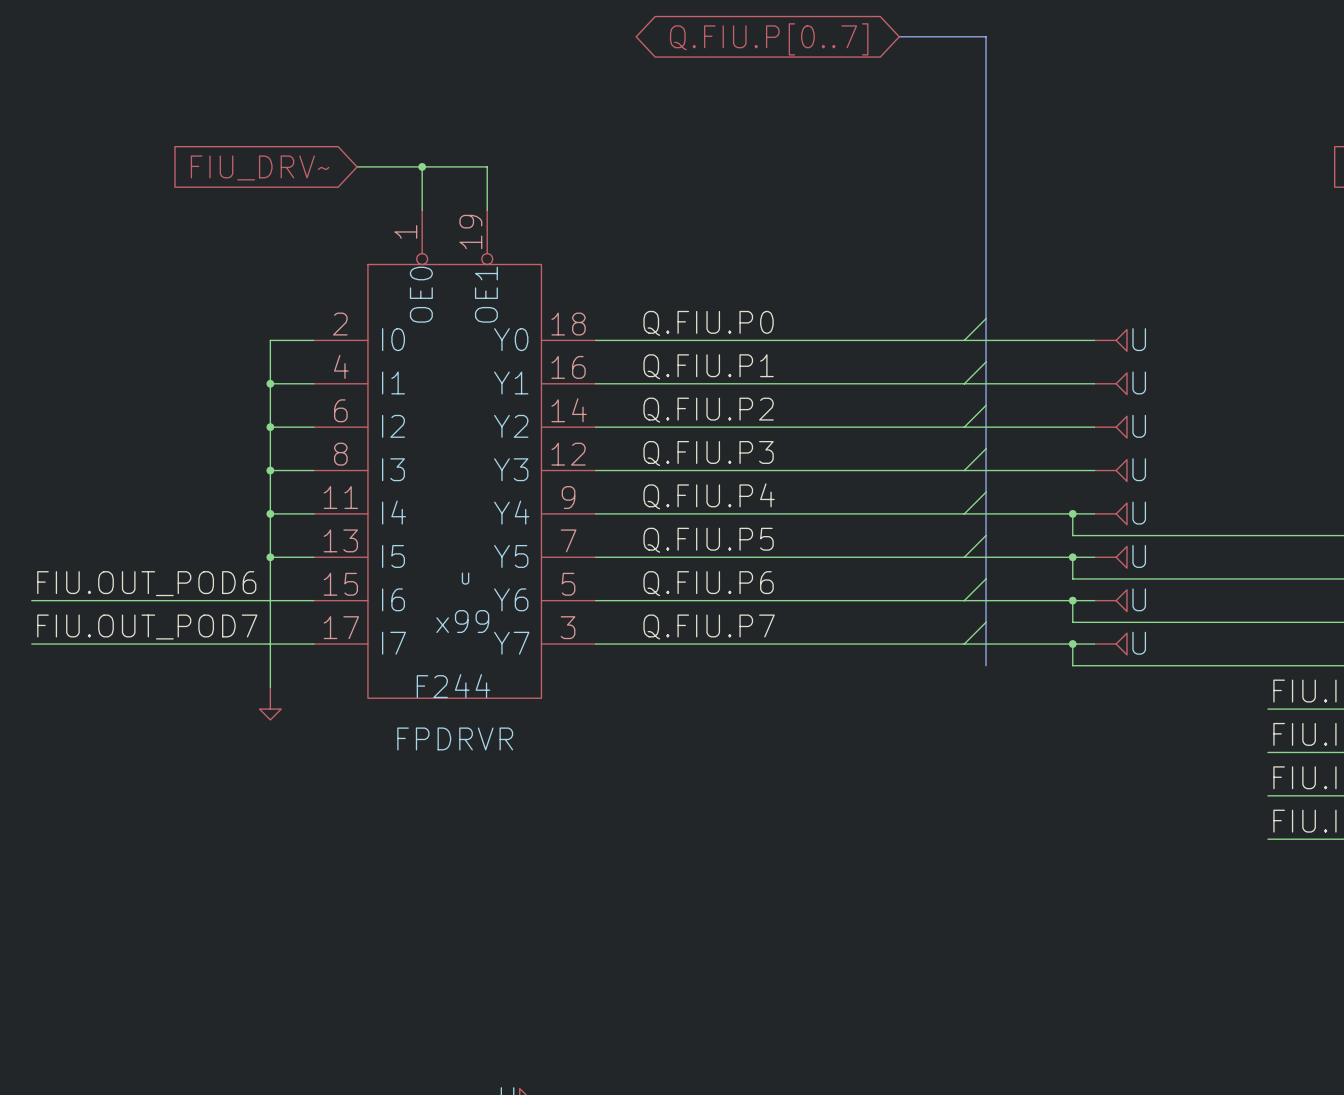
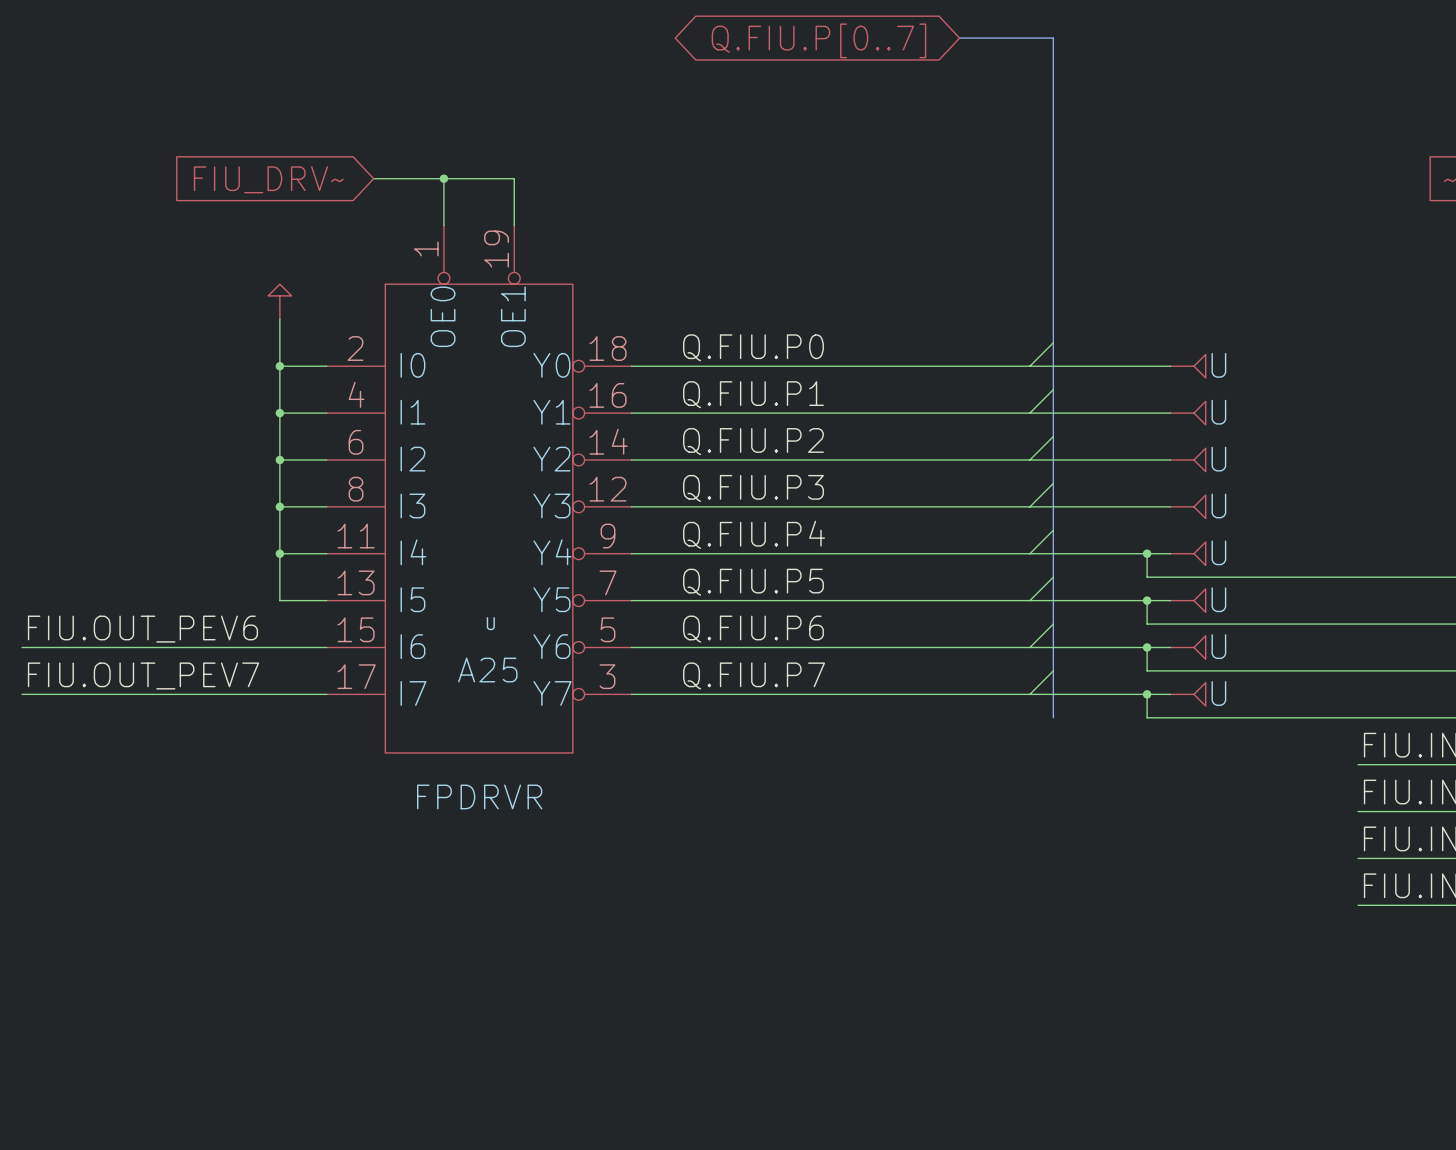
U symbol: [313, 210, 596, 699] -> [326, 225, 632, 753]
power symbol: none -> (279, 301)
wire: none -> (279, 319) (279, 366)
junction: none -> (279, 366)
wire: (270, 557) (270, 687) -> none
junction: (270, 557) -> none
label: FIU.OUT_POD6 (146, 583) -> FIU.OUT_PEV6 (142, 629)
U text: x99 (462, 621) -> A25 (487, 670)
label: FIU.OUT_POD7 (147, 627) -> FIU.OUT_PEV7 (143, 675)
U value: F244 (453, 686) -> none
power symbol: (270, 703) -> none

